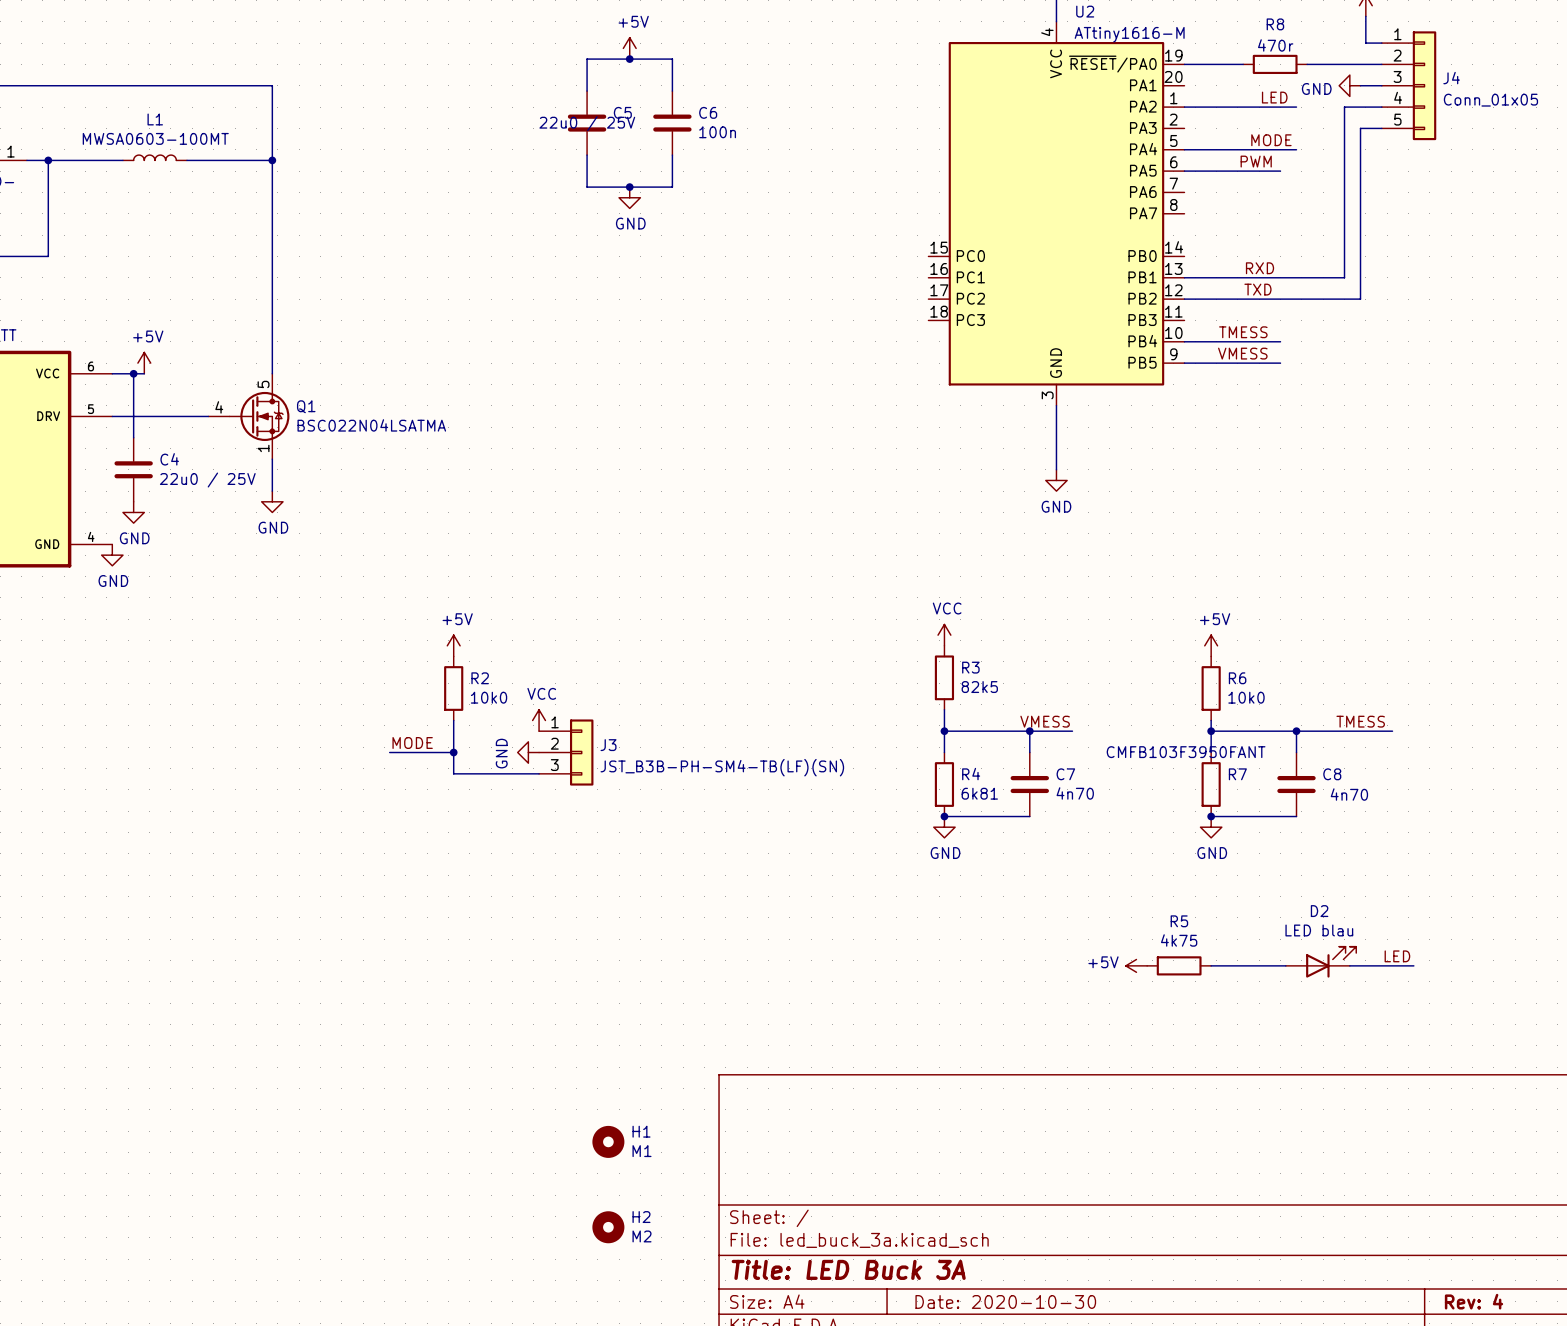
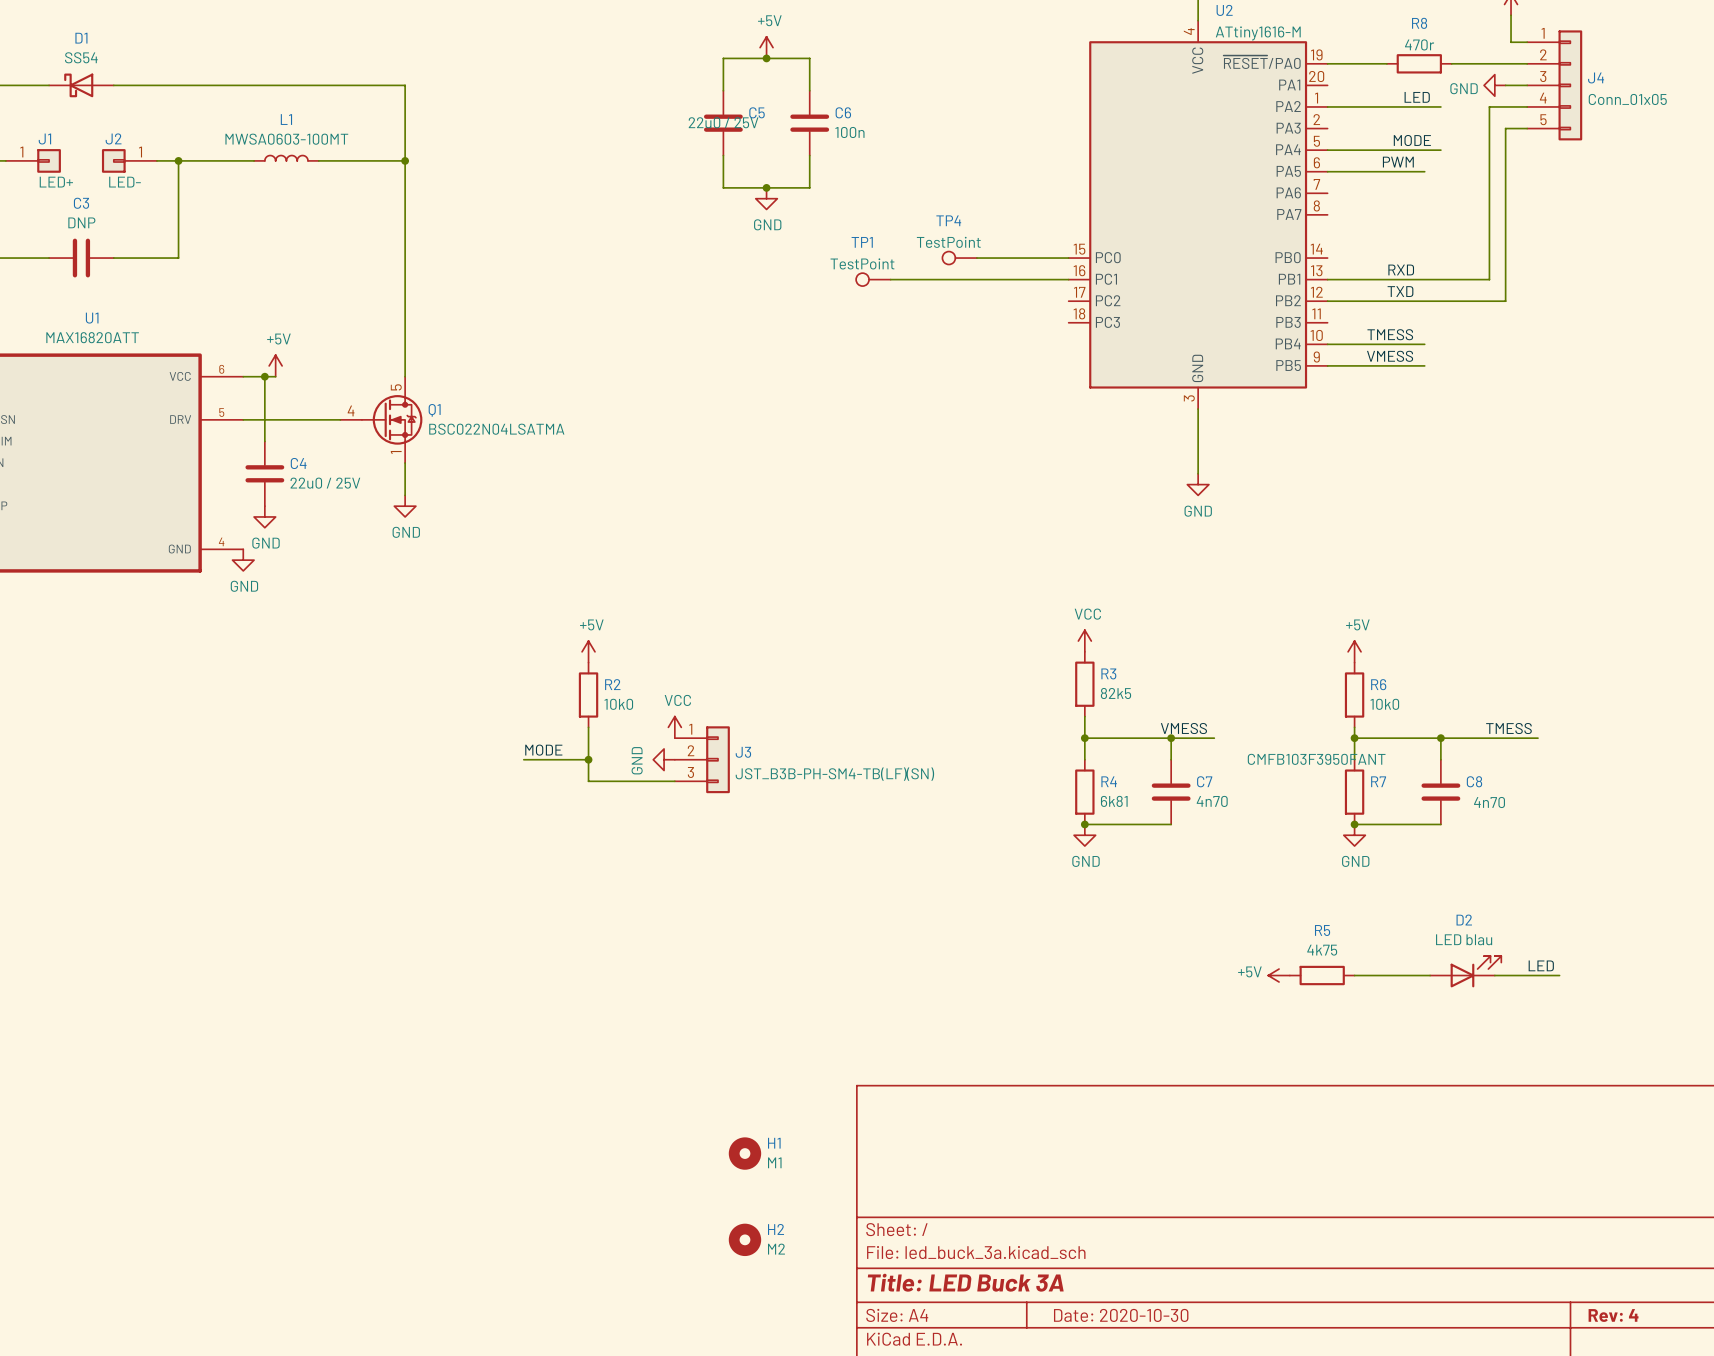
TP4: none -> TestPoint (959, 258)
wire: none -> (976, 258) (1068, 258)
TP1: none -> TestPoint (873, 279)
wire: none -> (890, 279) (1068, 279)

